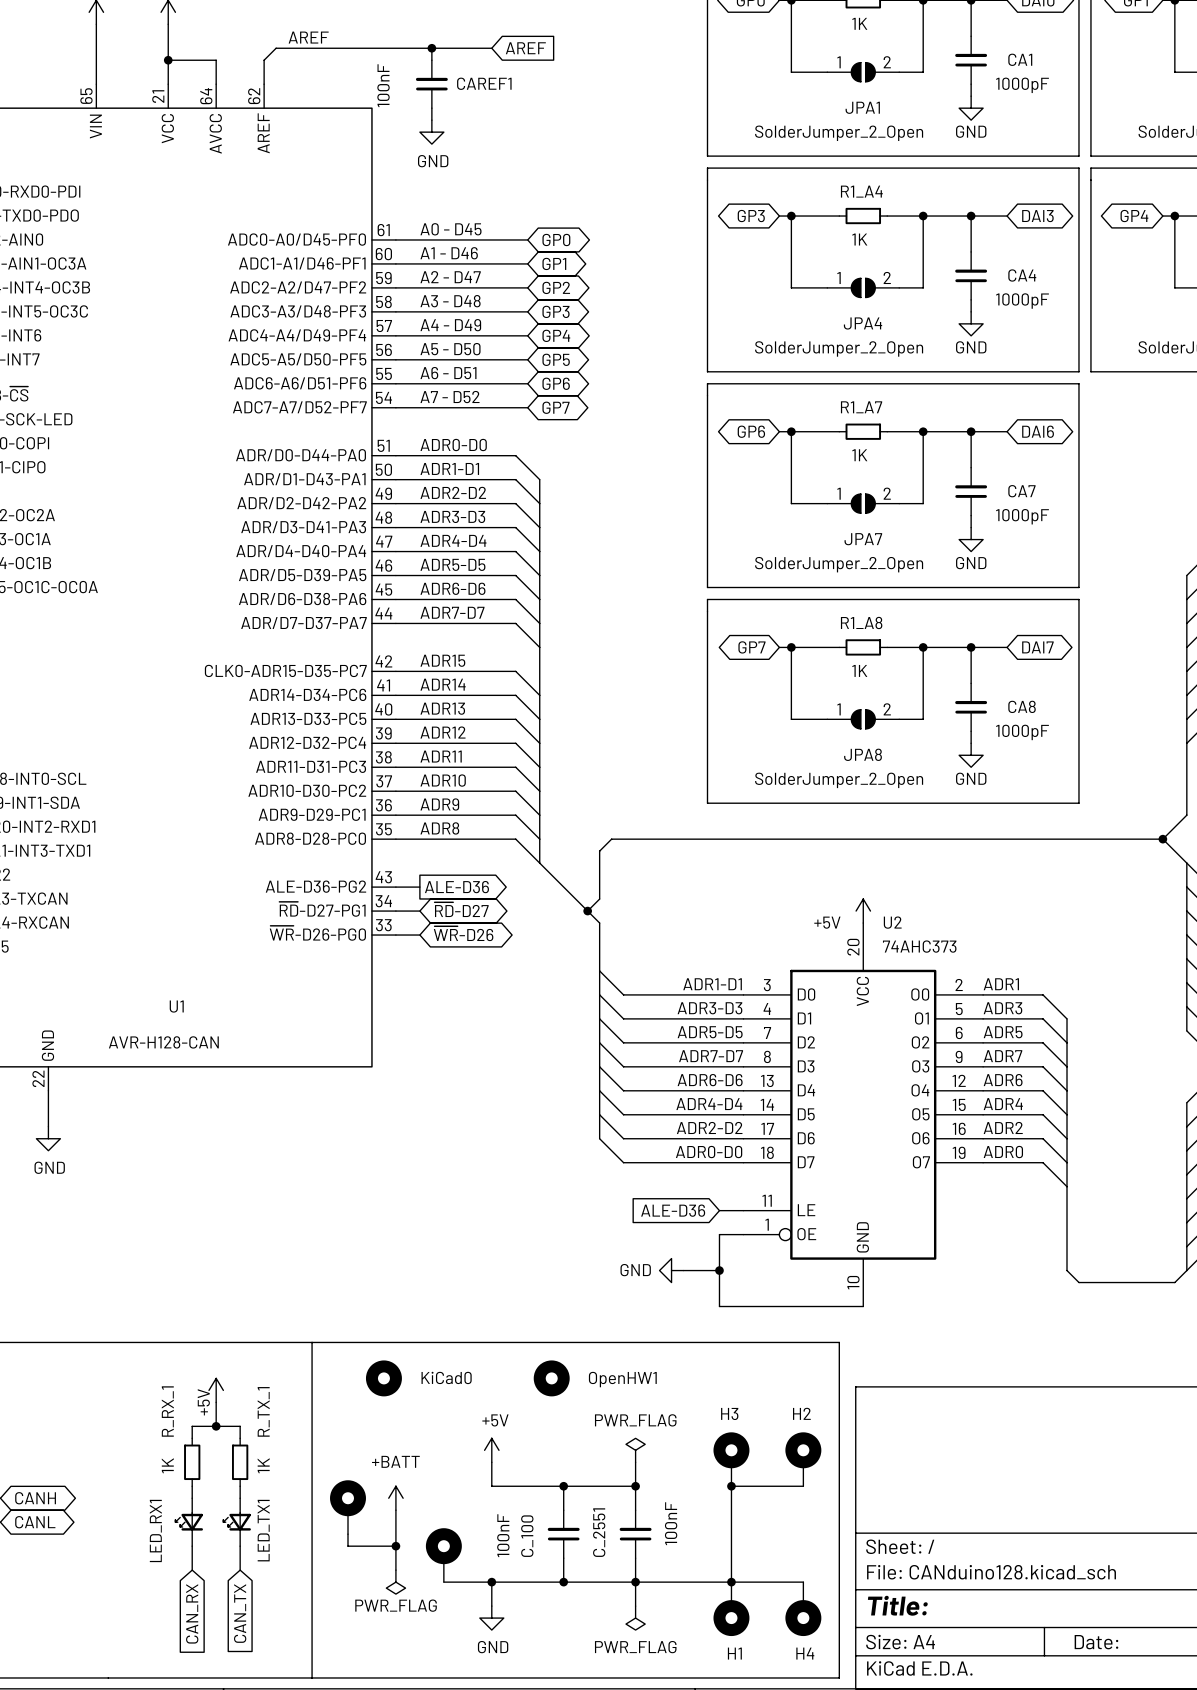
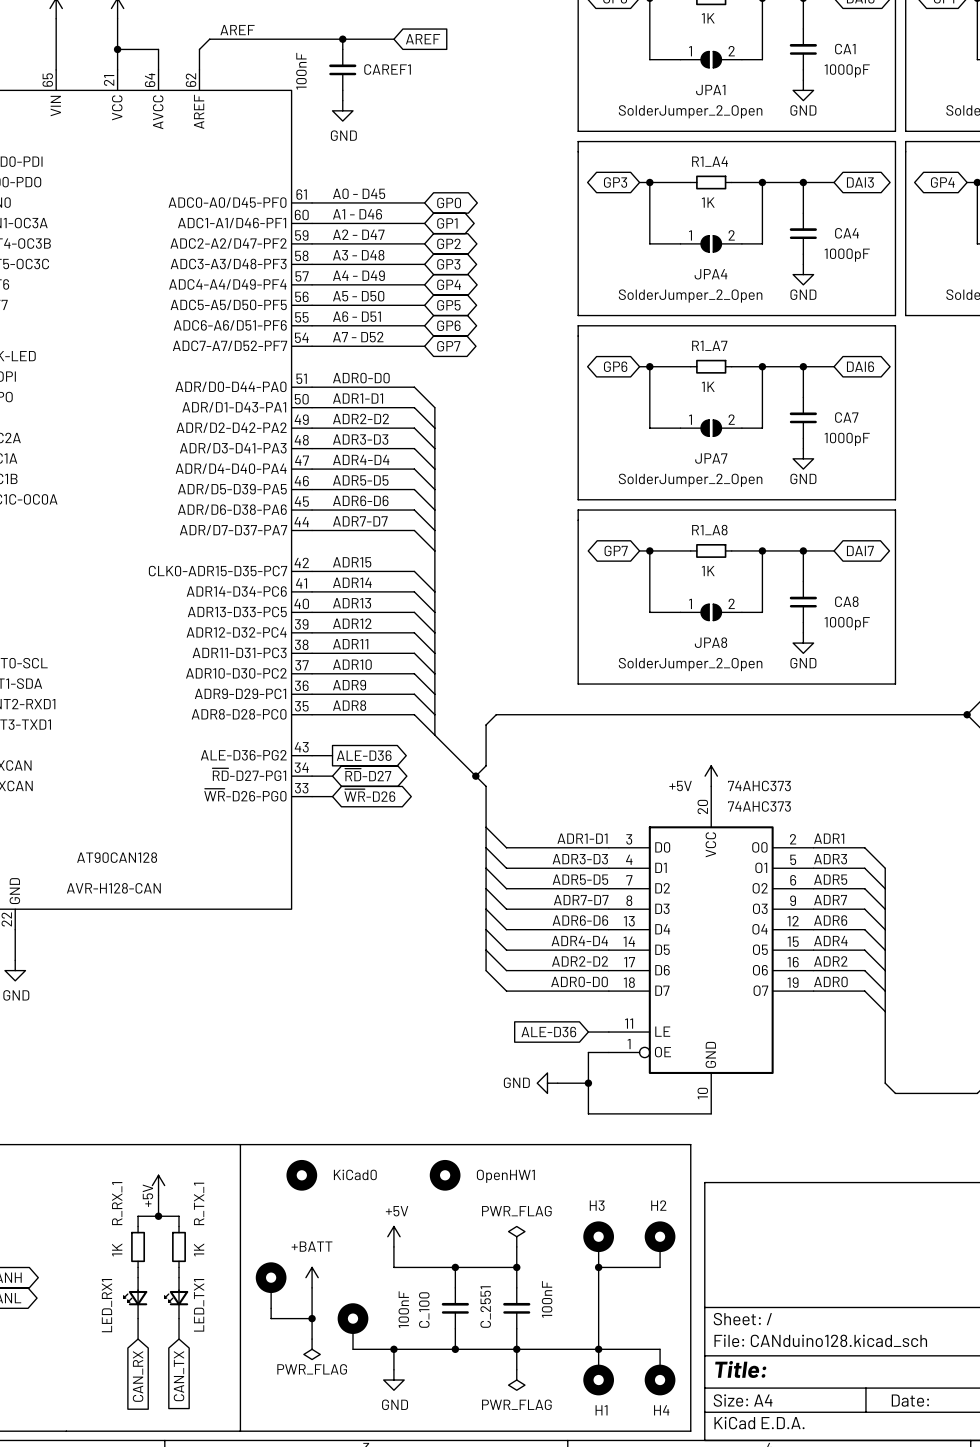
U2 name: U2 (892, 922) -> 74AHC373 (759, 786)
U1 name: U1 (176, 1006) -> AT90CAN128 (117, 857)

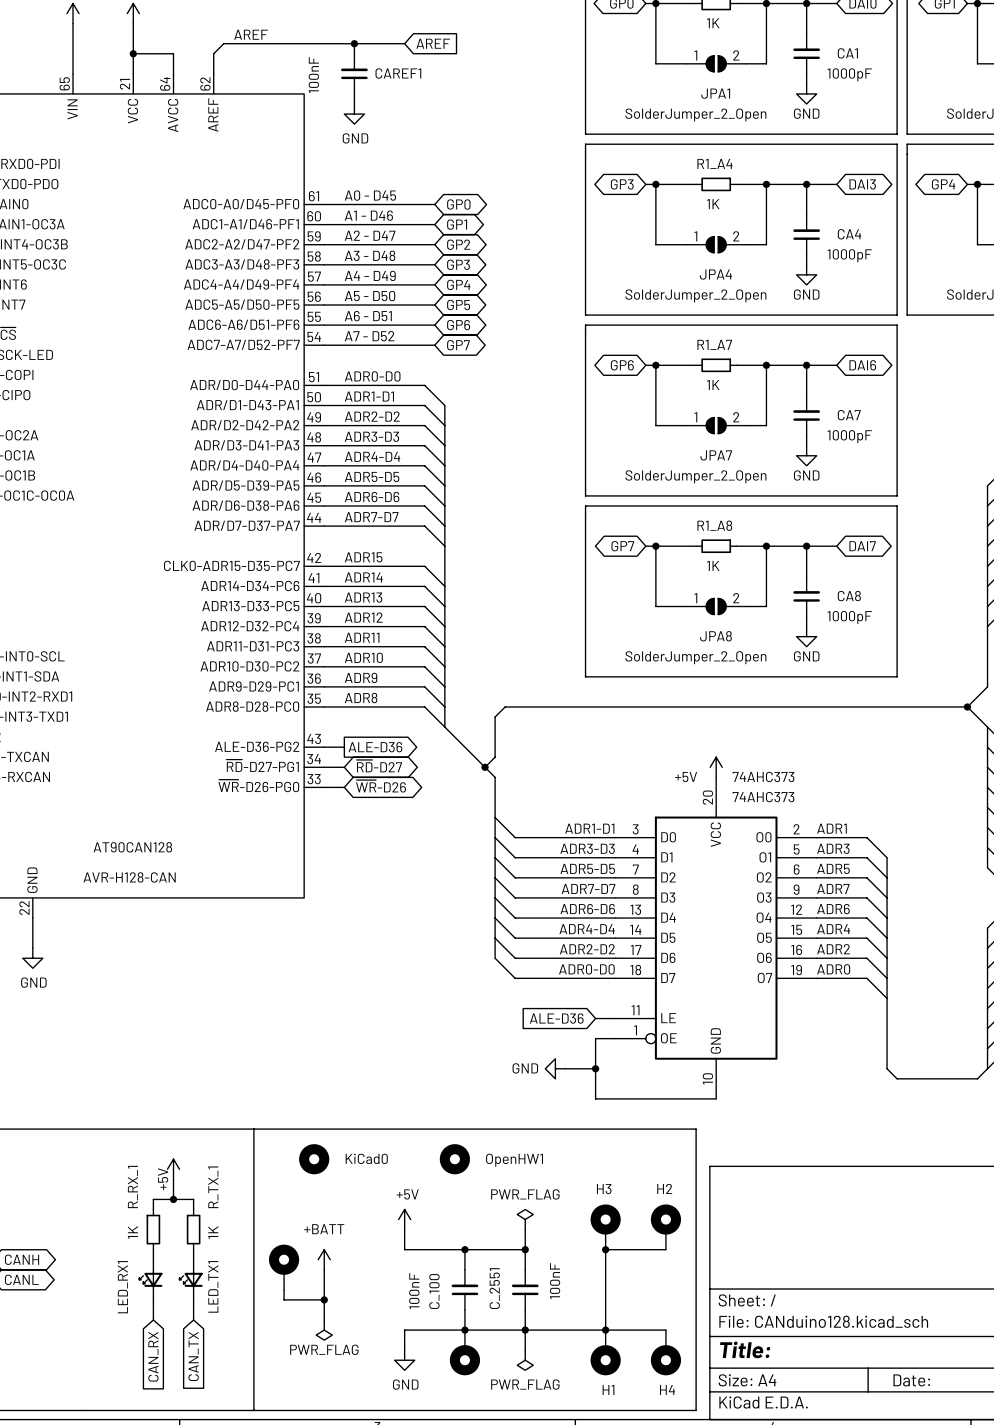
part rotation: 0° (353, 1318) -> 180° (464, 1360)
part position: (353, 1326) -> (464, 1352)
wire: (353, 1349) (393, 1349) -> none
junction: (393, 1349) -> none

